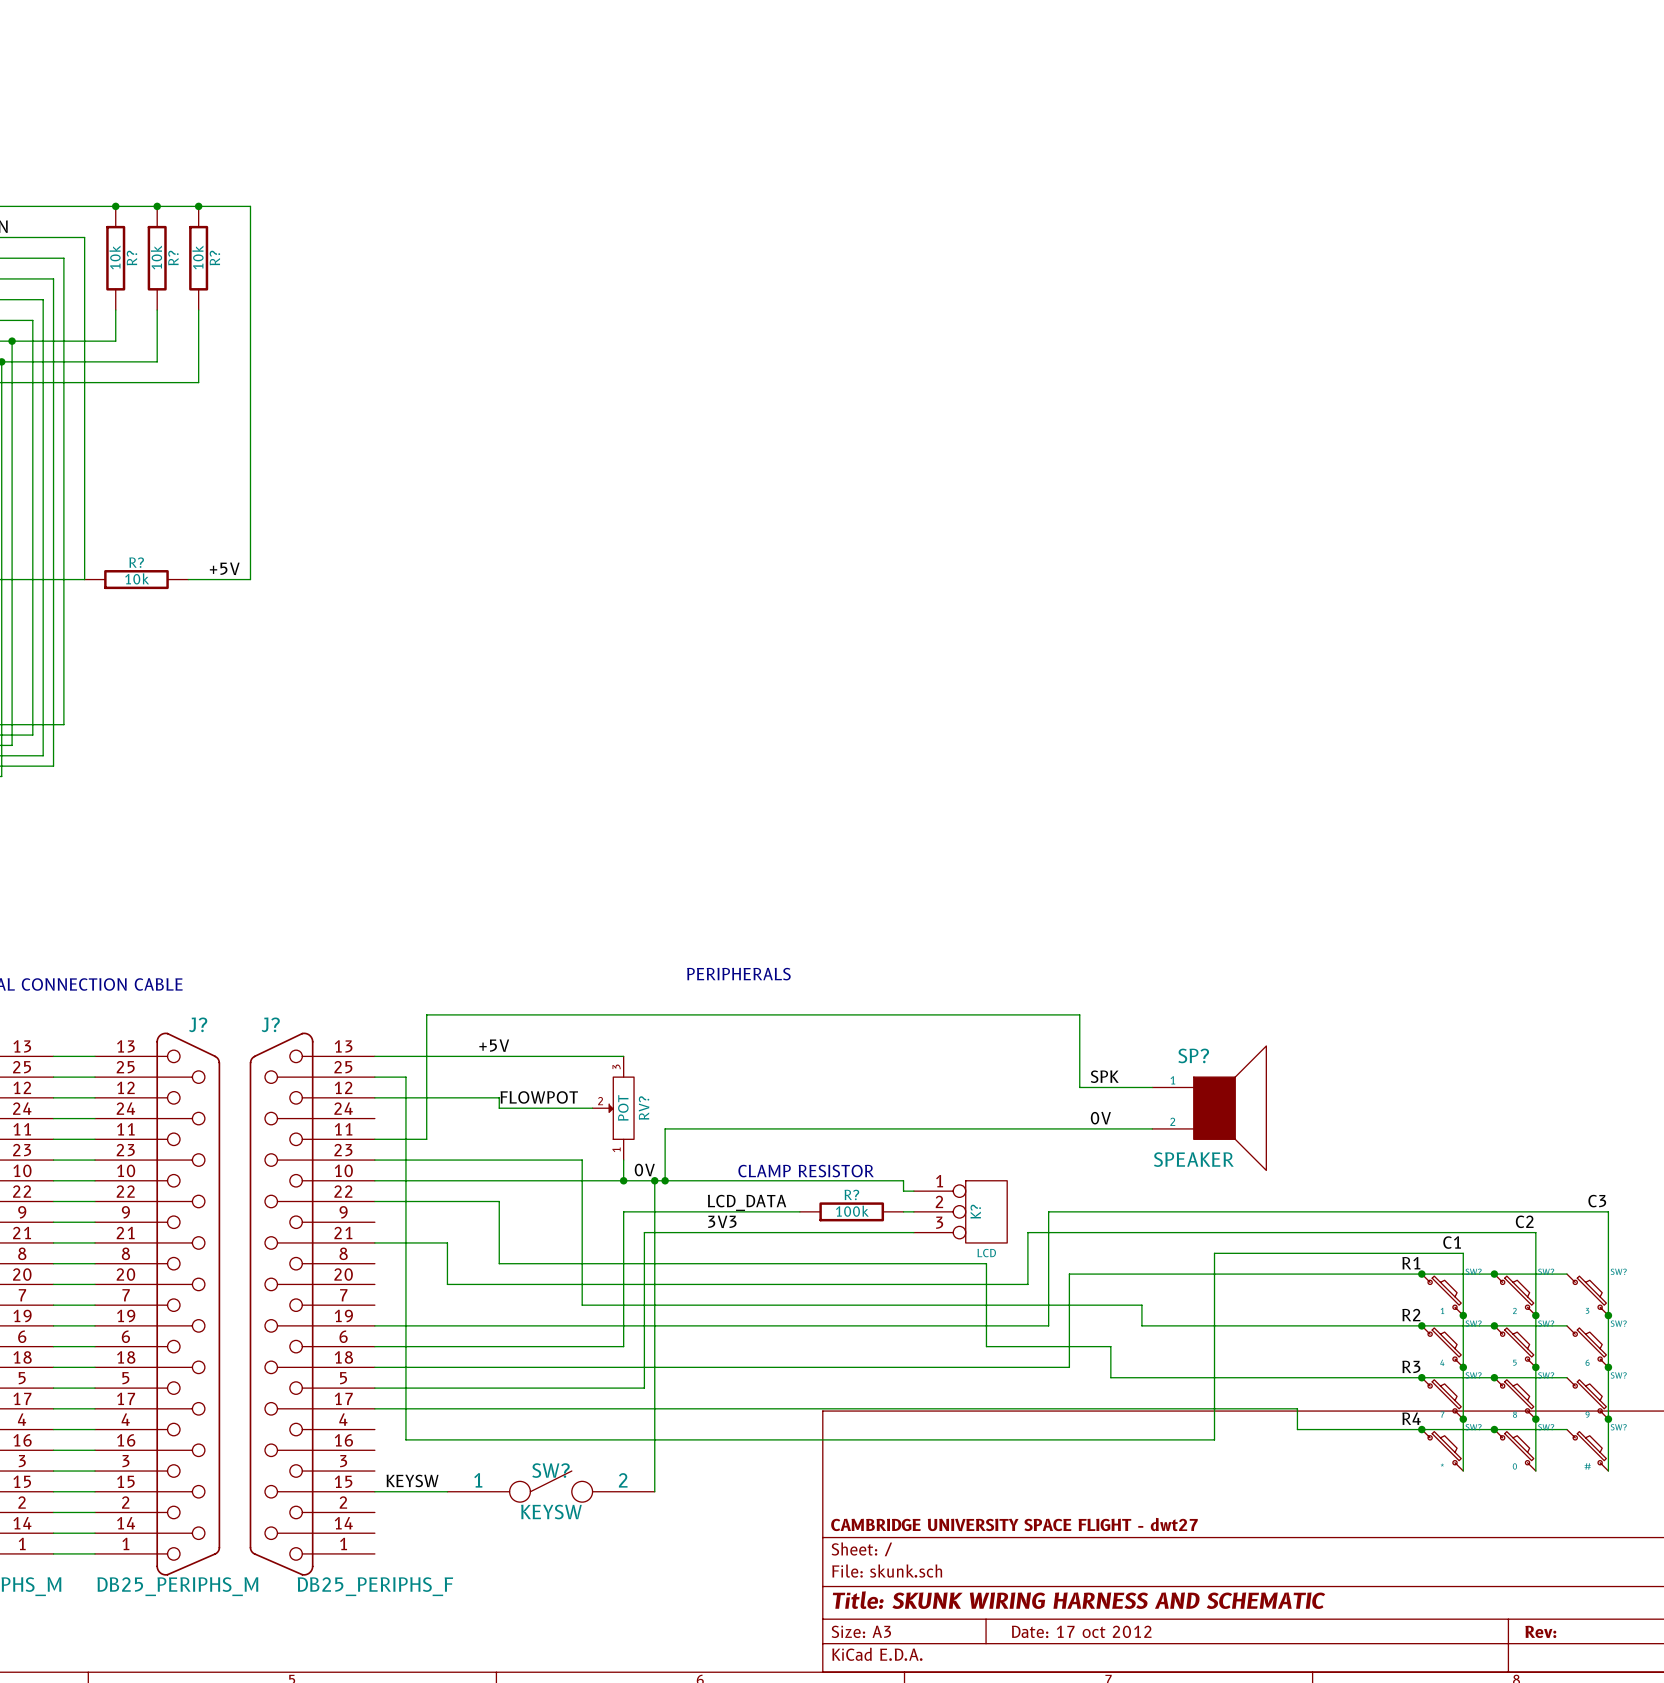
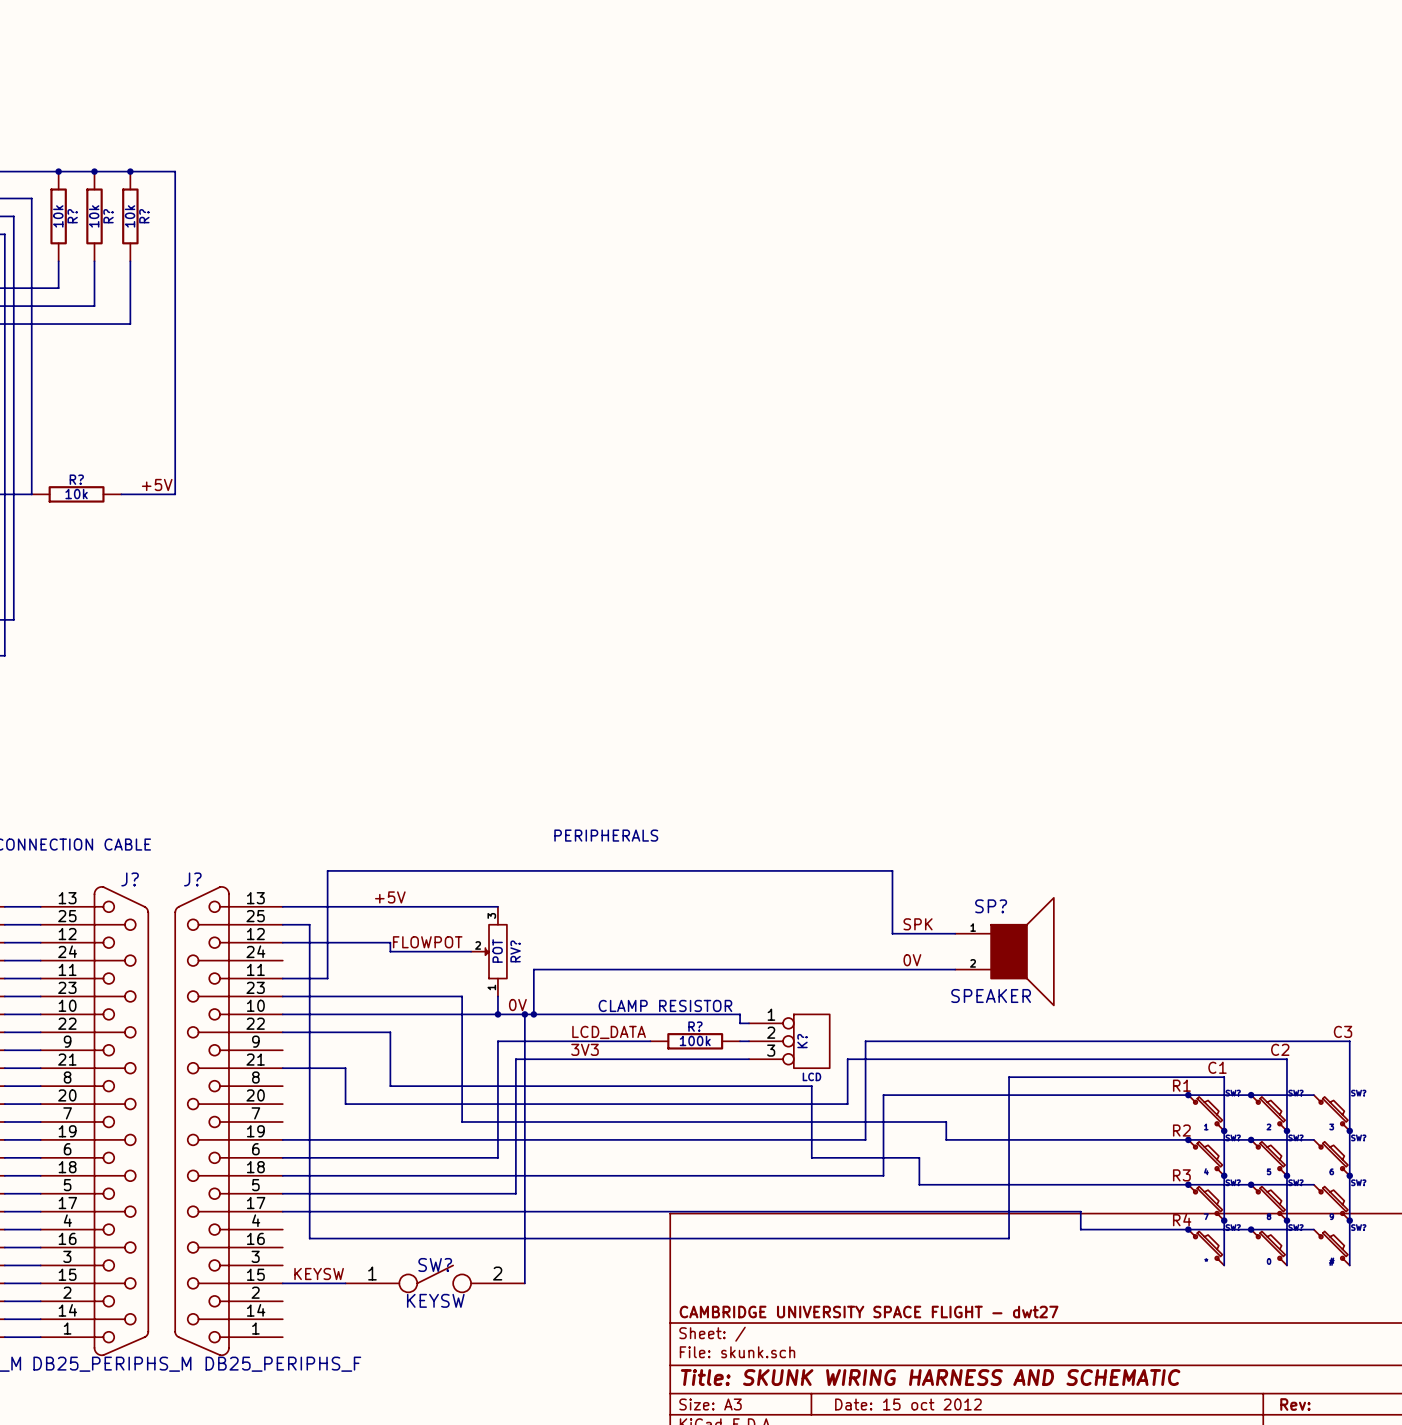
title block: Date: 17 oct 2012 (1081, 1631) -> Date: 15 oct 2012 (908, 1404)

